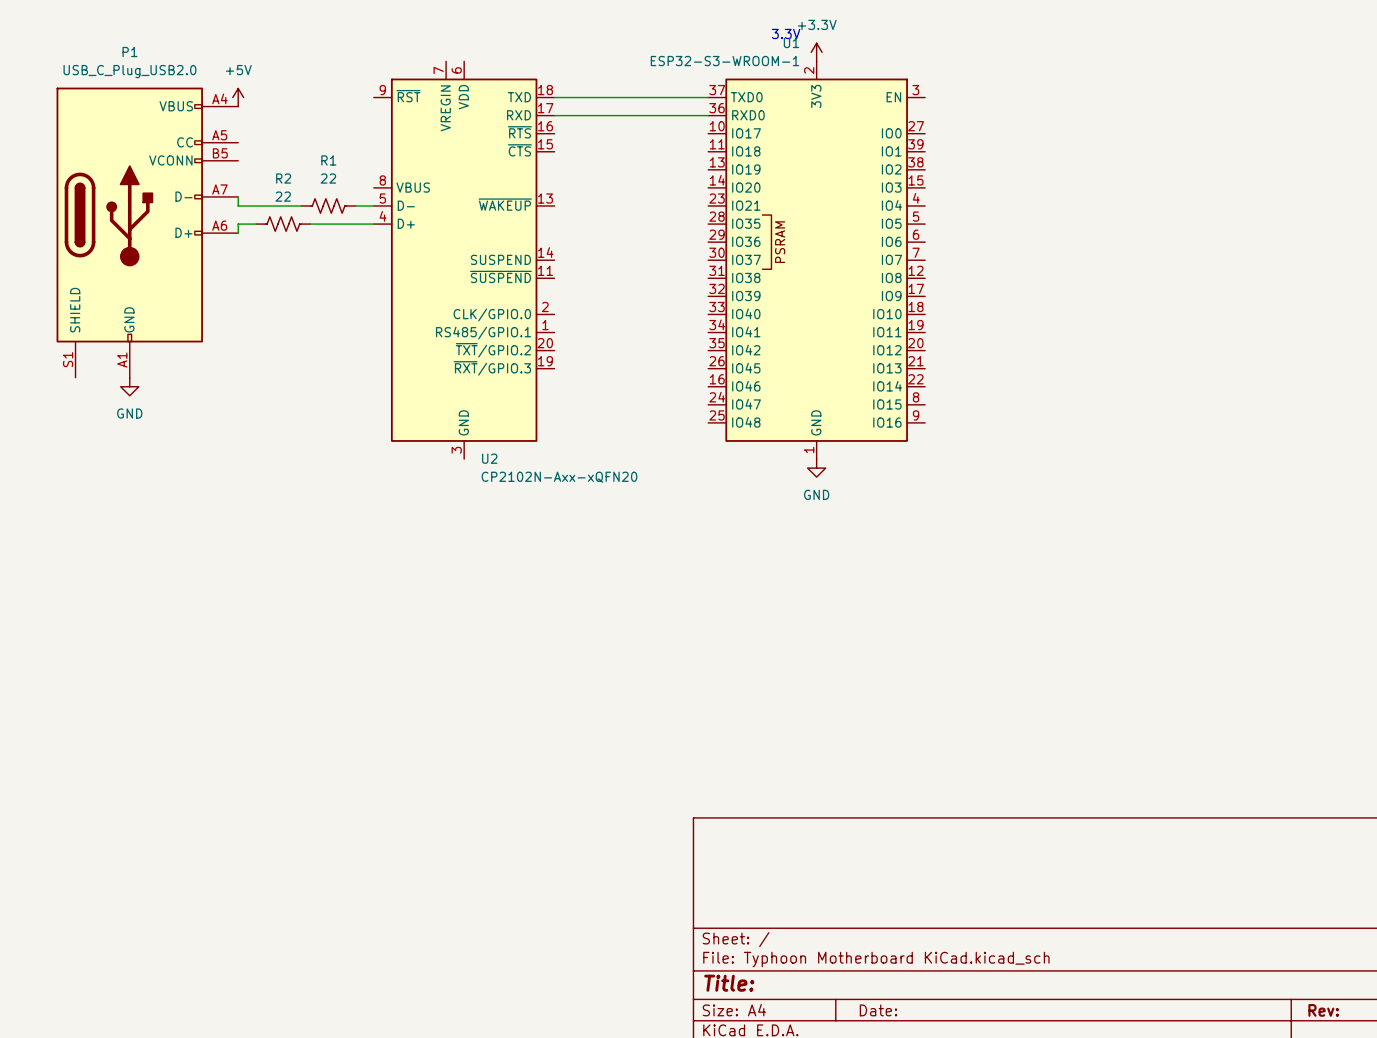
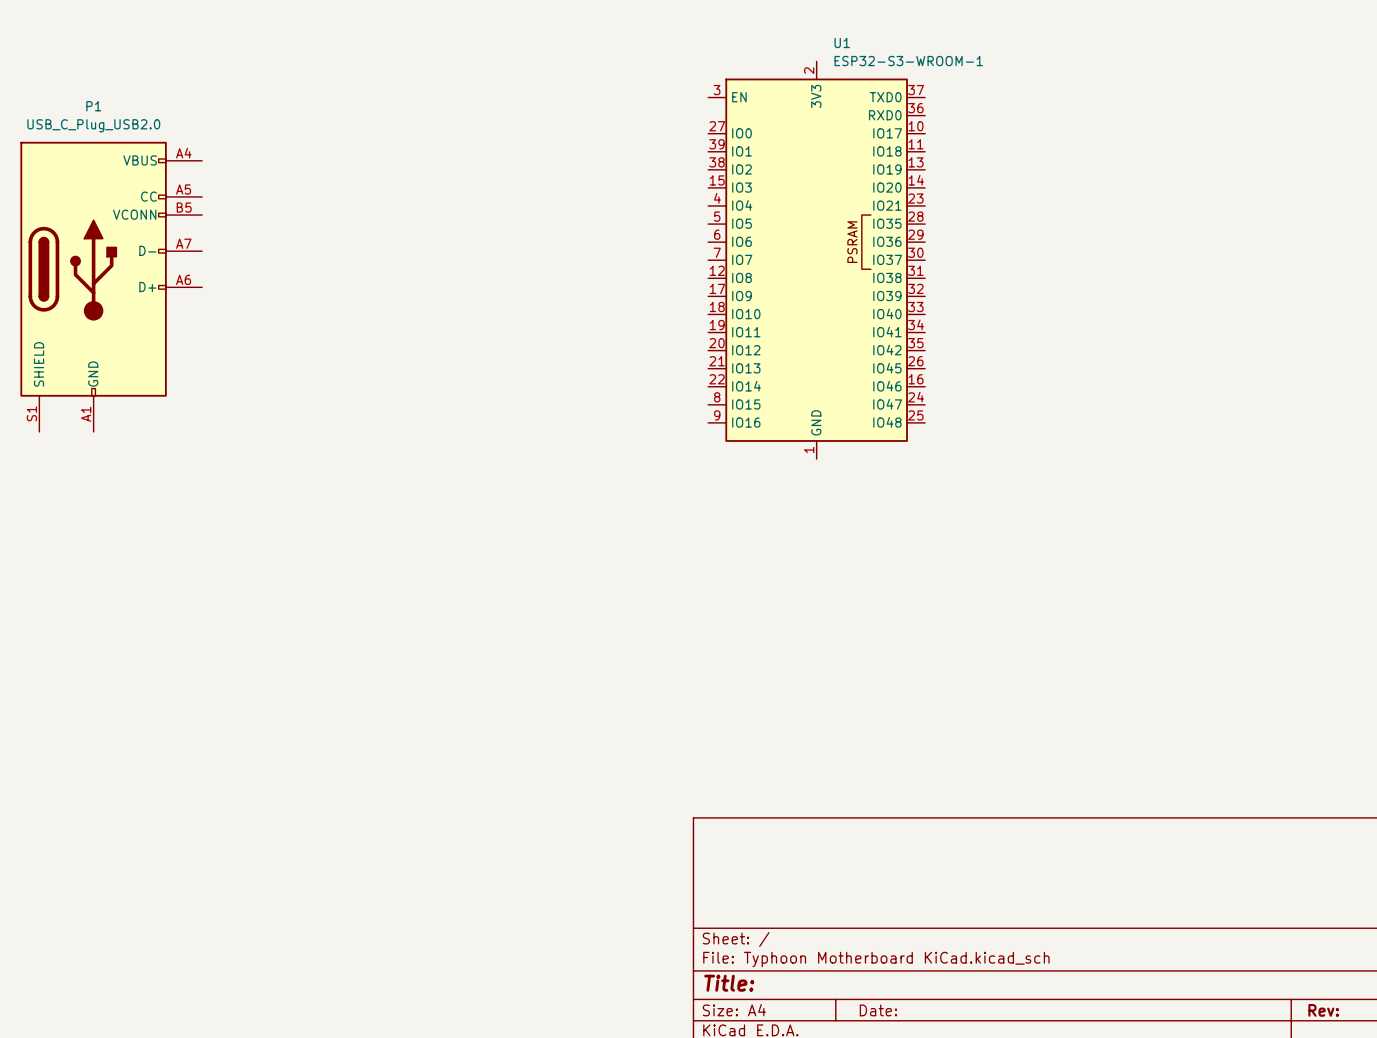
text: 3.3V (786, 33) -> none
power symbol: +3.3V (816, 52) -> none
power symbol: +5V (238, 97) -> none
wire: (554, 97) (708, 97) -> none
wire: (554, 115) (708, 115) -> none
wire: (238, 196) (238, 205) (301, 205) -> none
R1: 22 (328, 205) -> none
wire: (355, 205) (373, 205) -> none
wire: (256, 224) (238, 224) (238, 233) -> none
R2: 22 (283, 224) -> none
wire: (310, 224) (373, 224) -> none
P1 position: (147, 232) -> (111, 286)
U2: CP2102N-Axx-xQFN20 (464, 260) -> none
U1 flip: as is (816, 260) -> left-right (816, 260)
power symbol: GND (129, 386) -> none
power symbol: GND (816, 468) -> none

